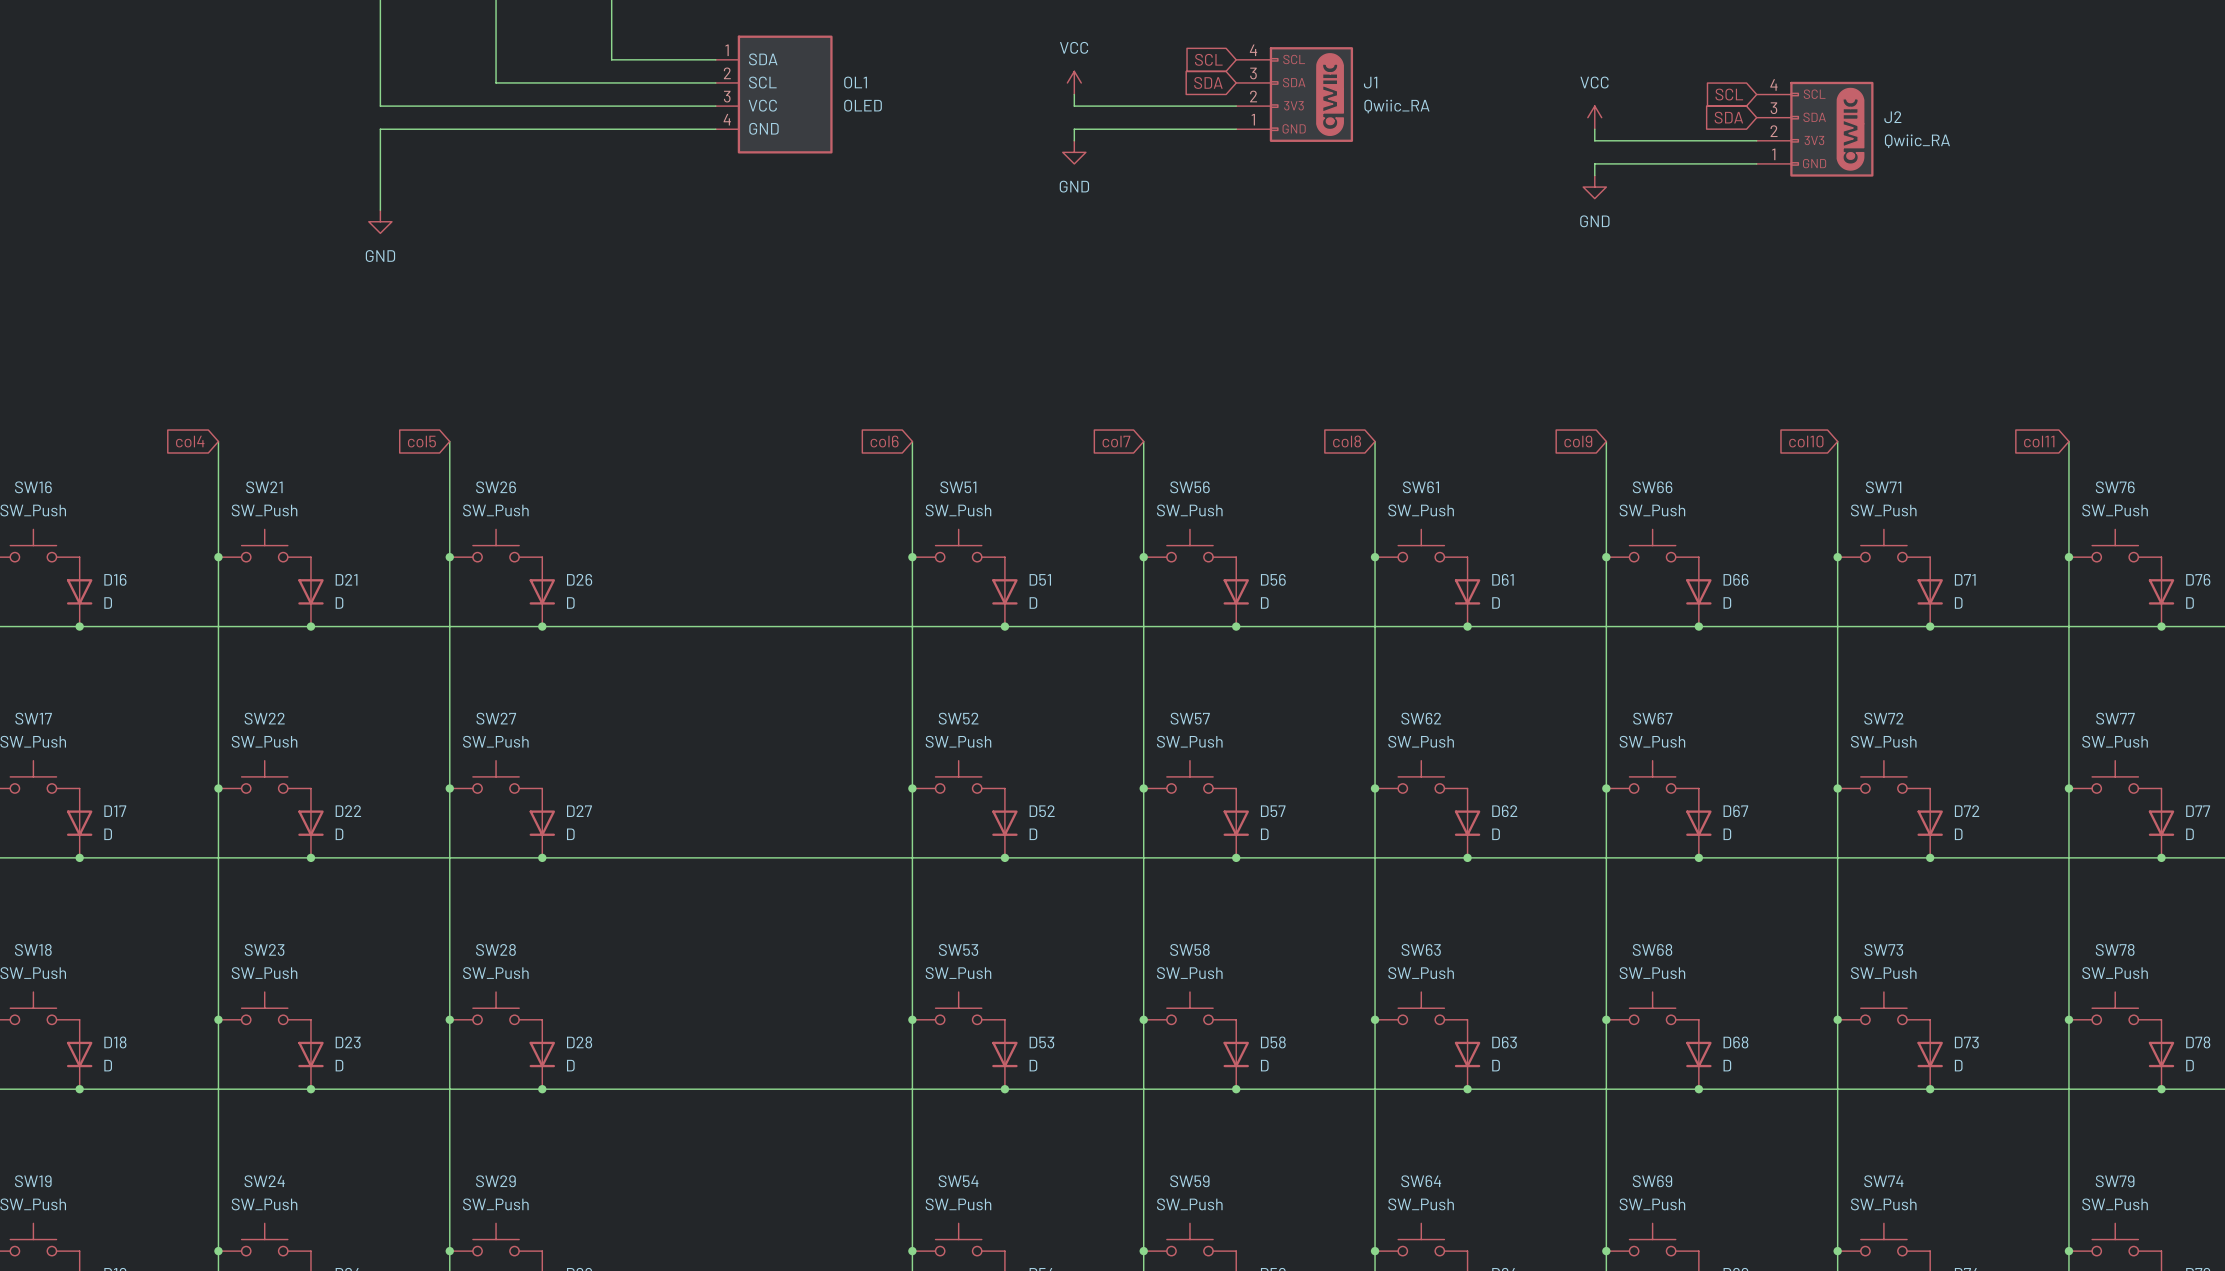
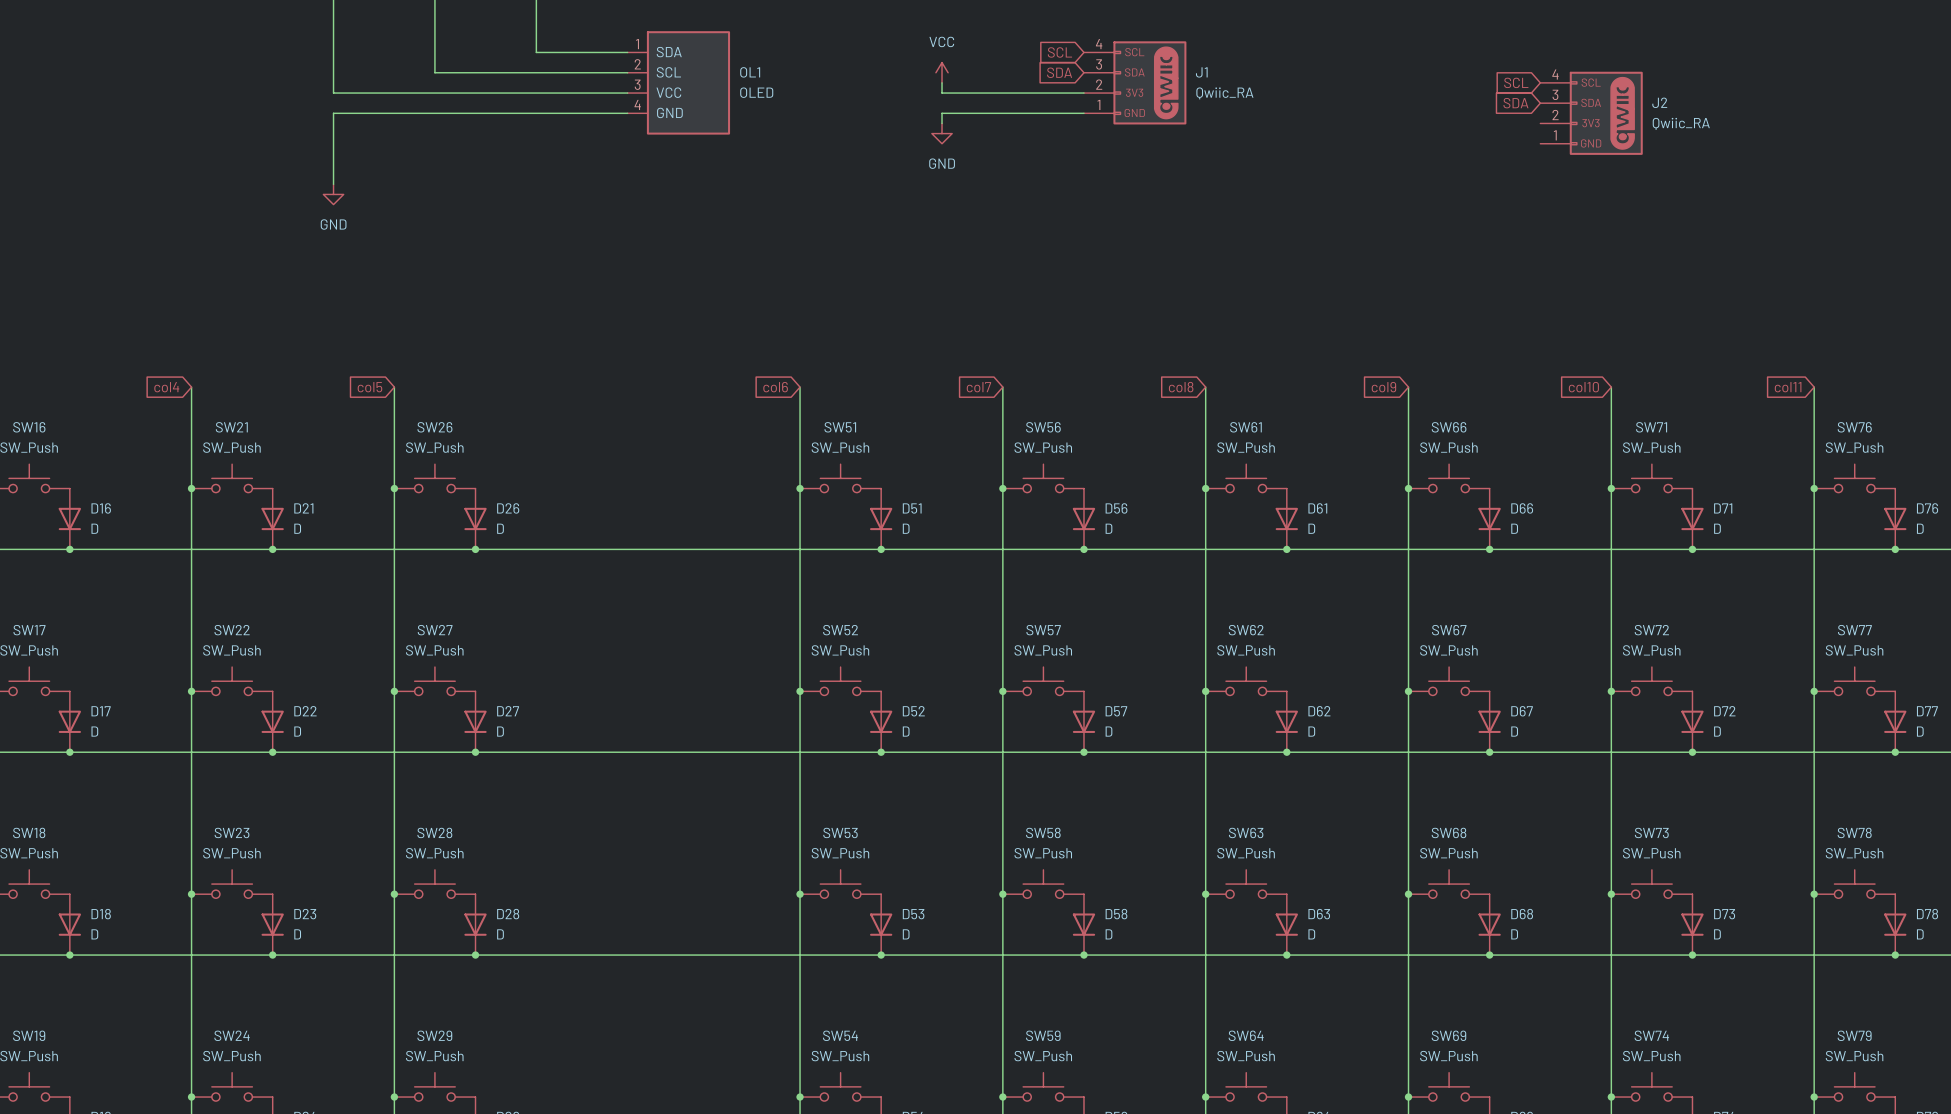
power symbol: VCC (1594, 117) -> none
wire: (1594, 129) (1594, 140) (1756, 140) -> none
wire: (1756, 163) (1594, 163) (1594, 175) -> none
power symbol: GND (1594, 187) -> none

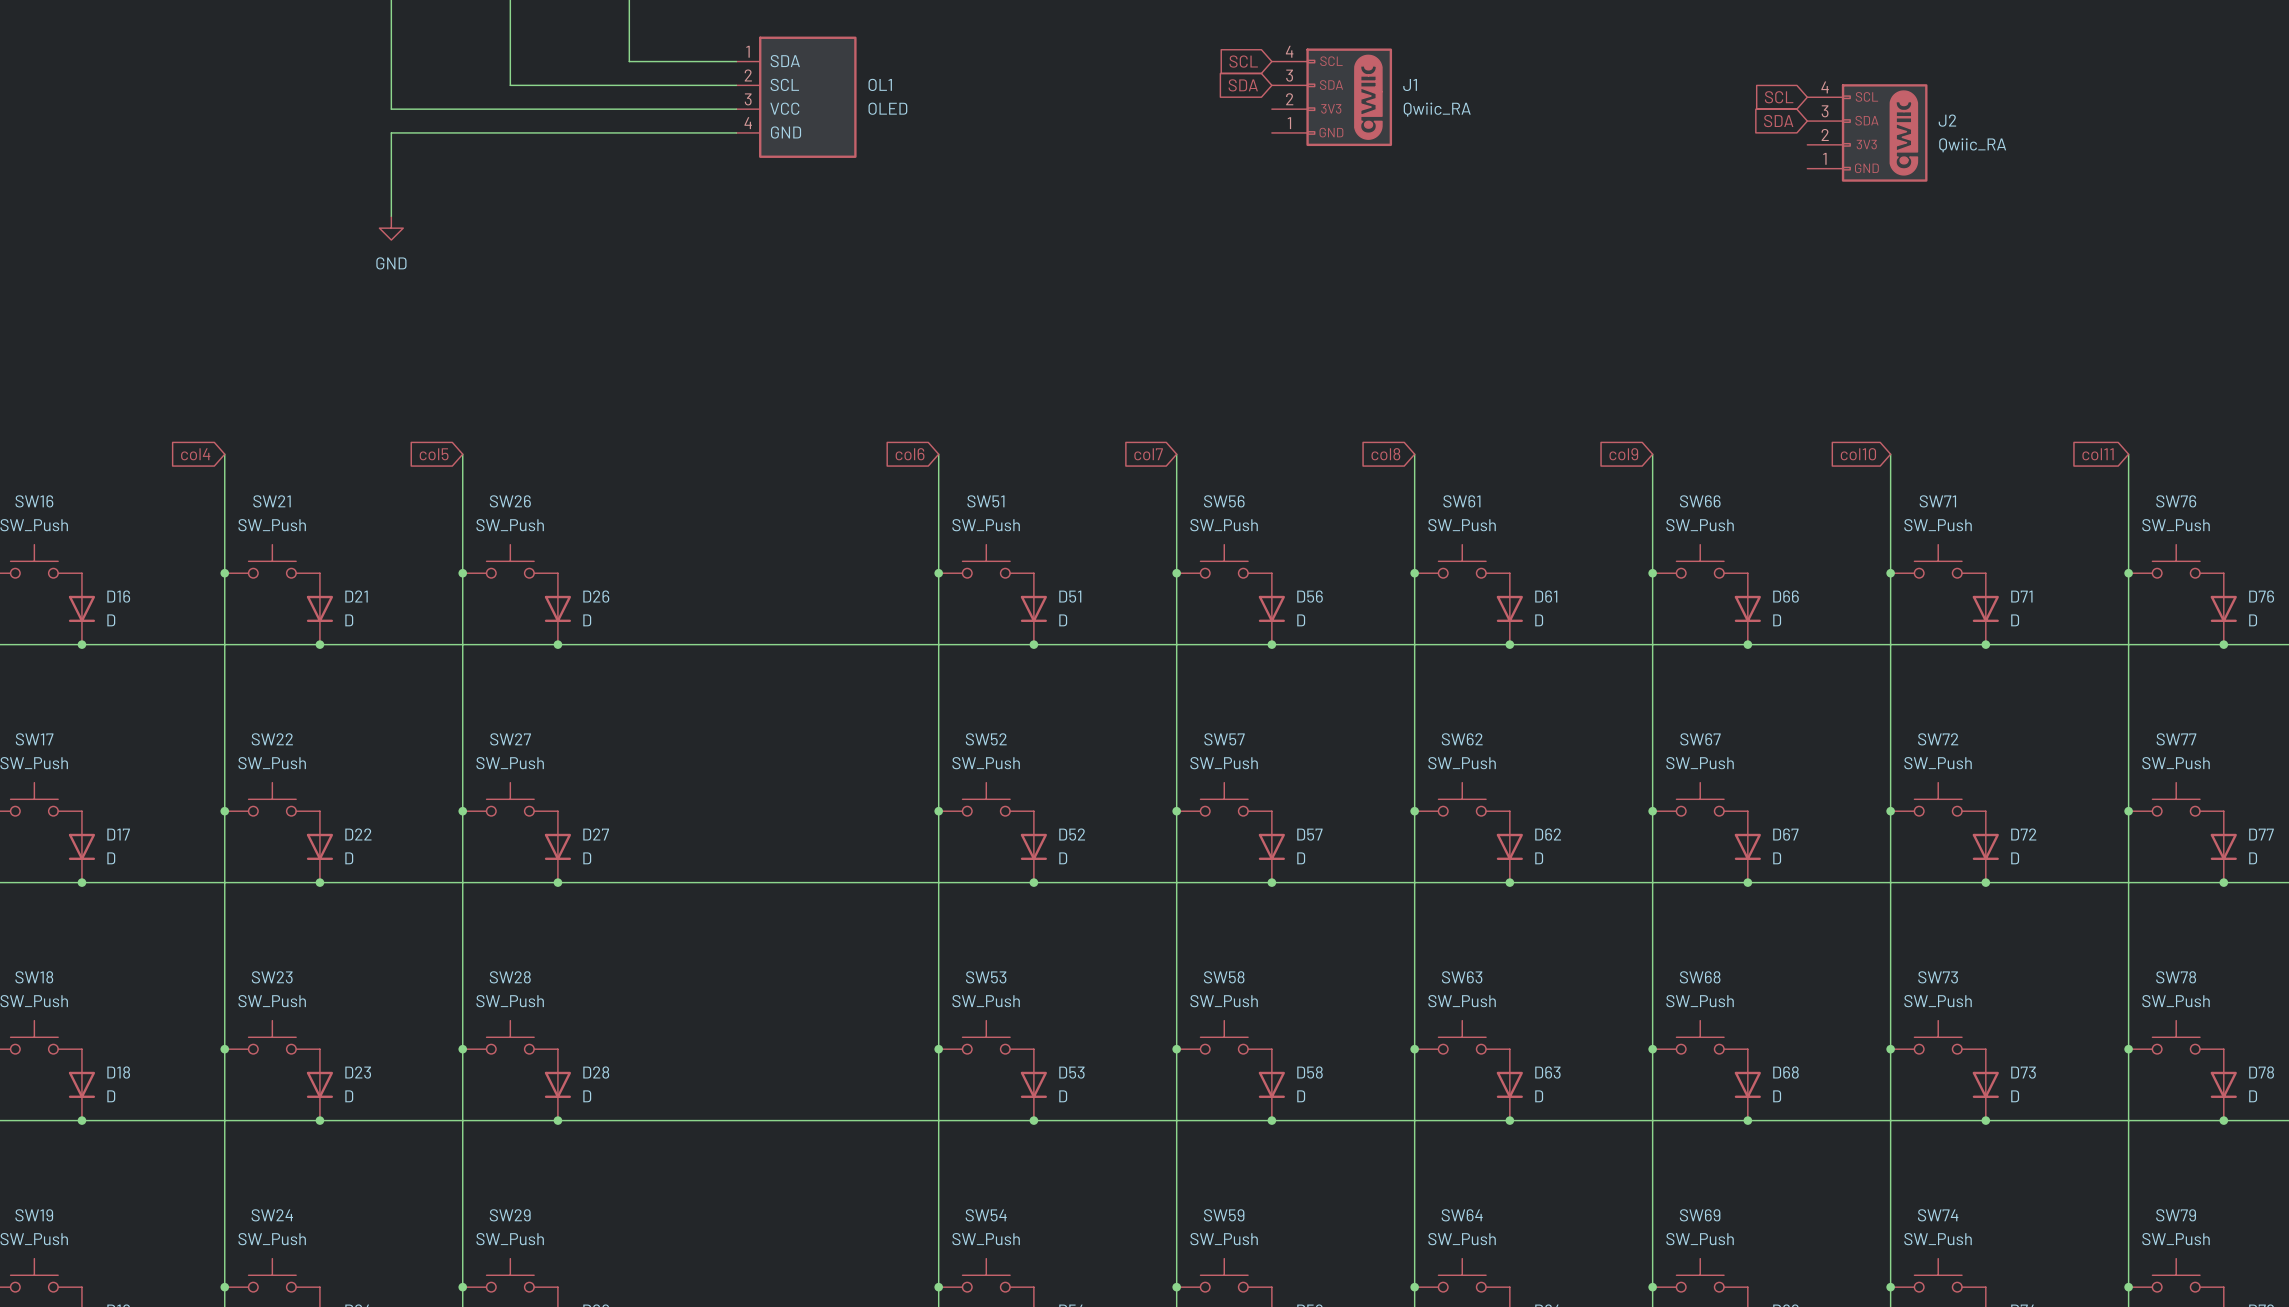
power symbol: VCC (942, 72) -> none
wire: (942, 82) (942, 93) (1083, 93) -> none
wire: (1083, 113) (942, 113) (942, 123) -> none
power symbol: GND (942, 133) -> none

